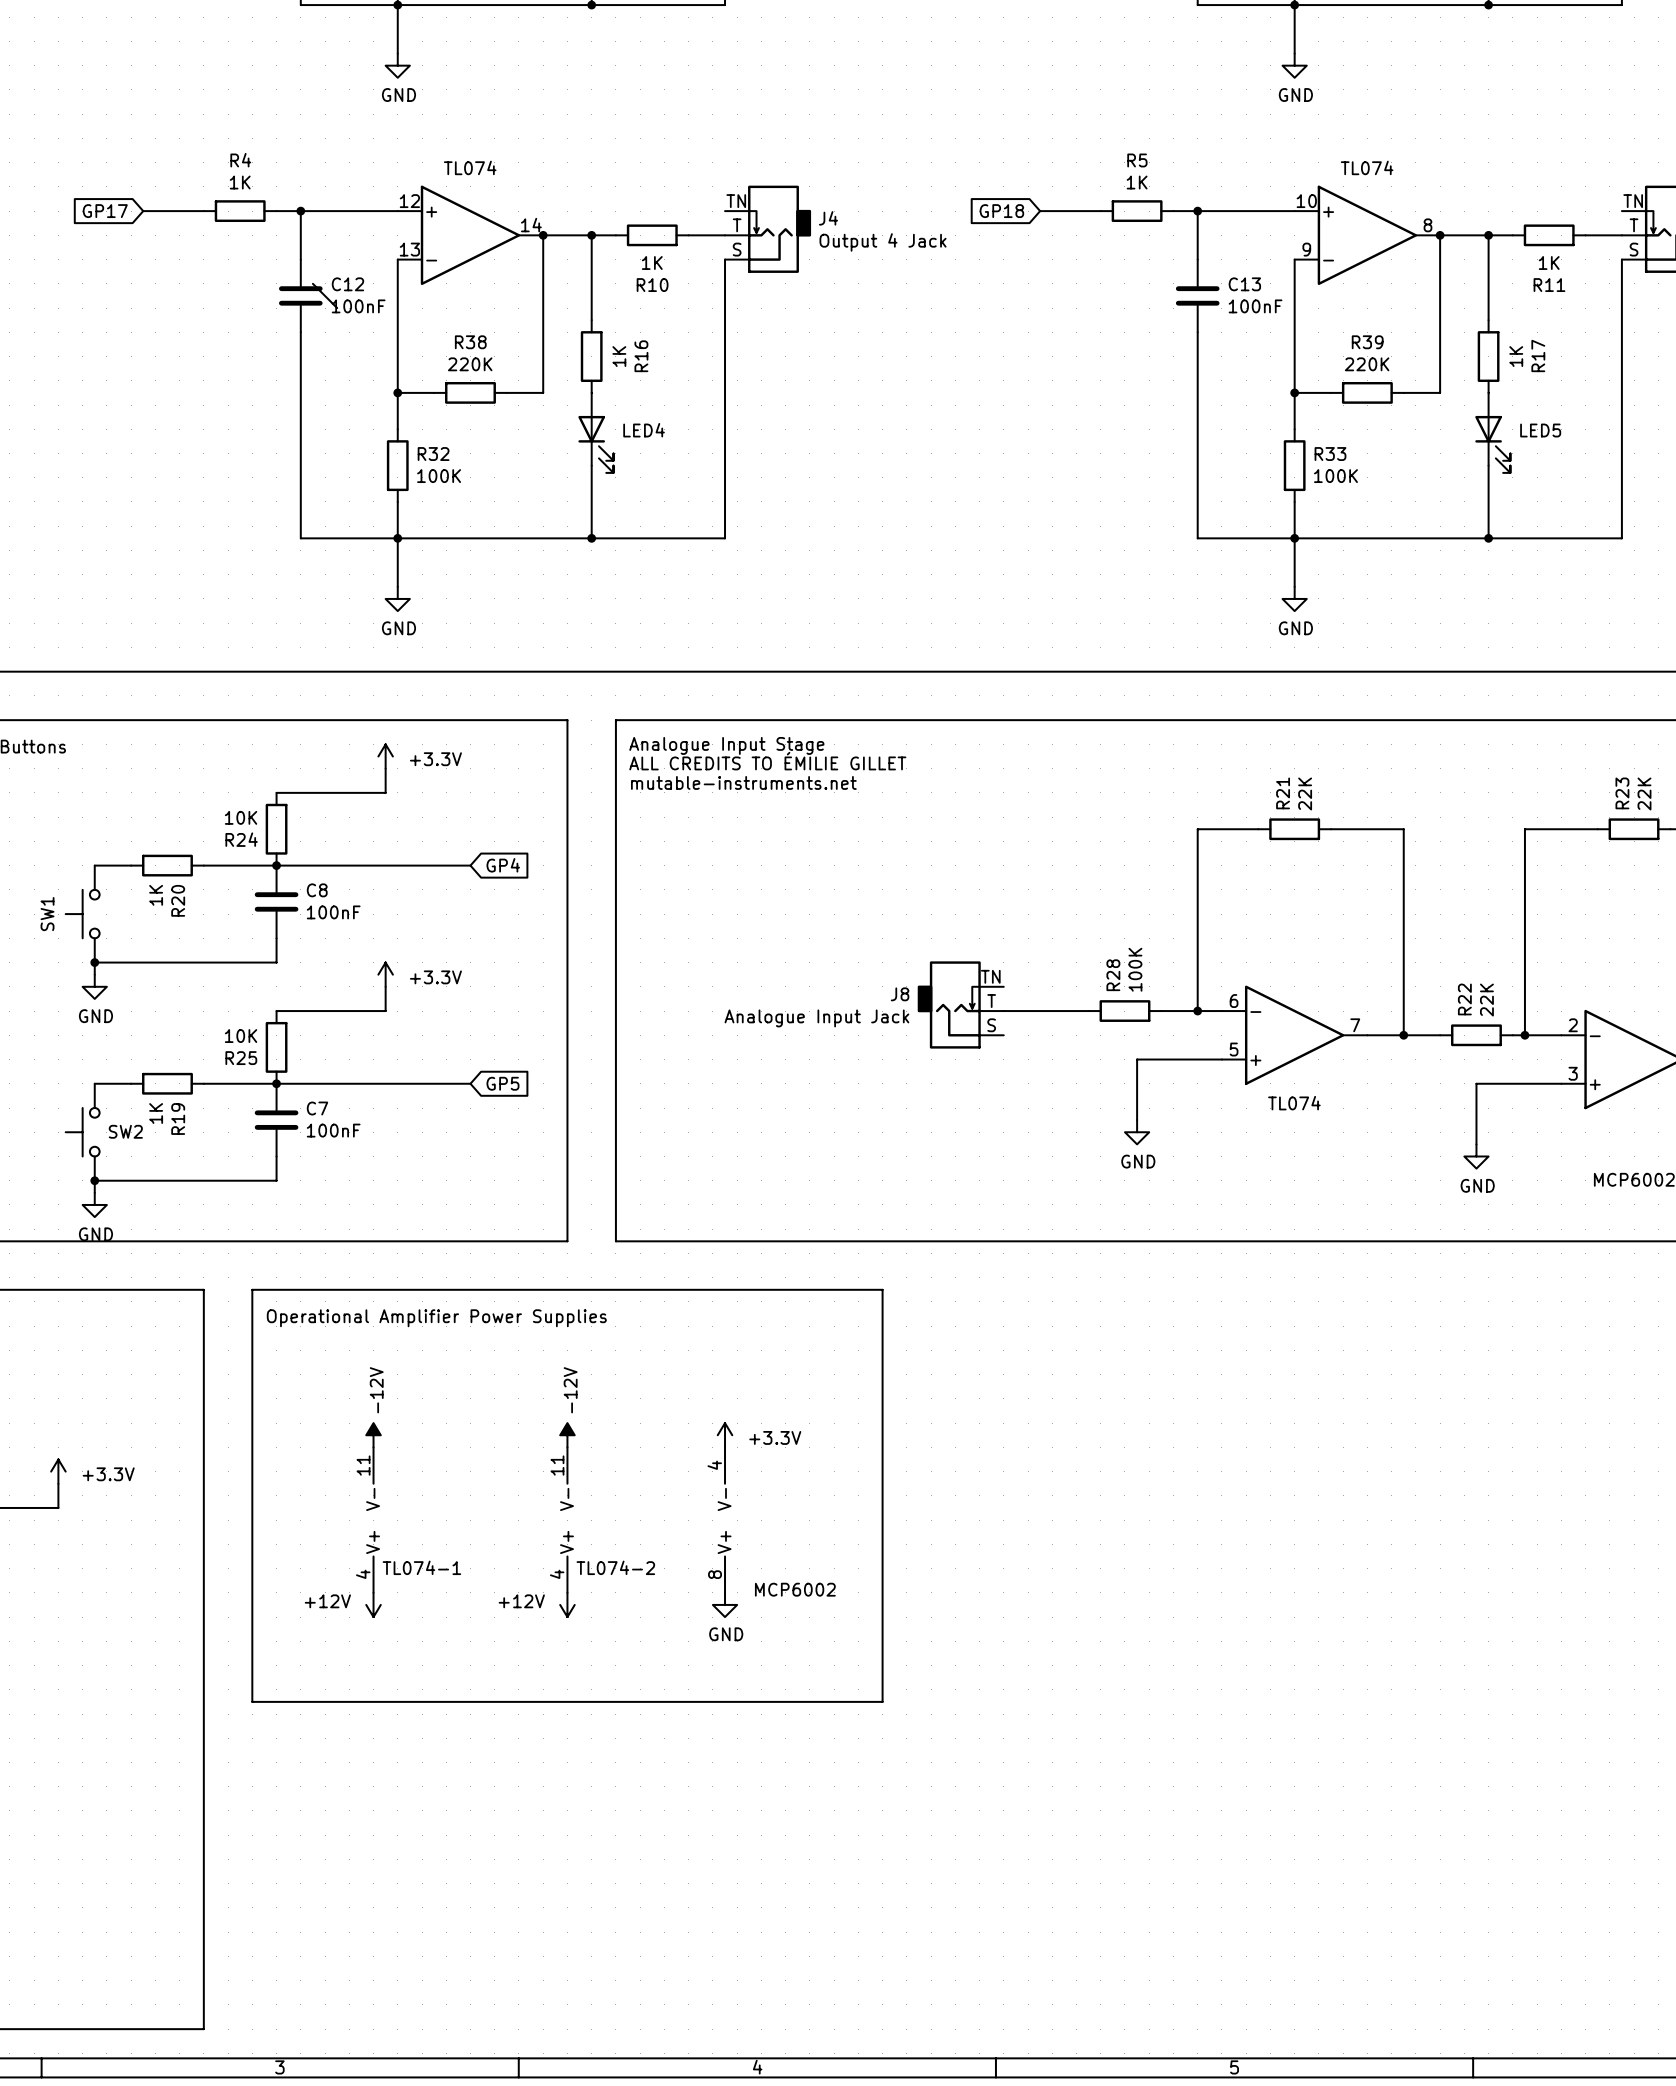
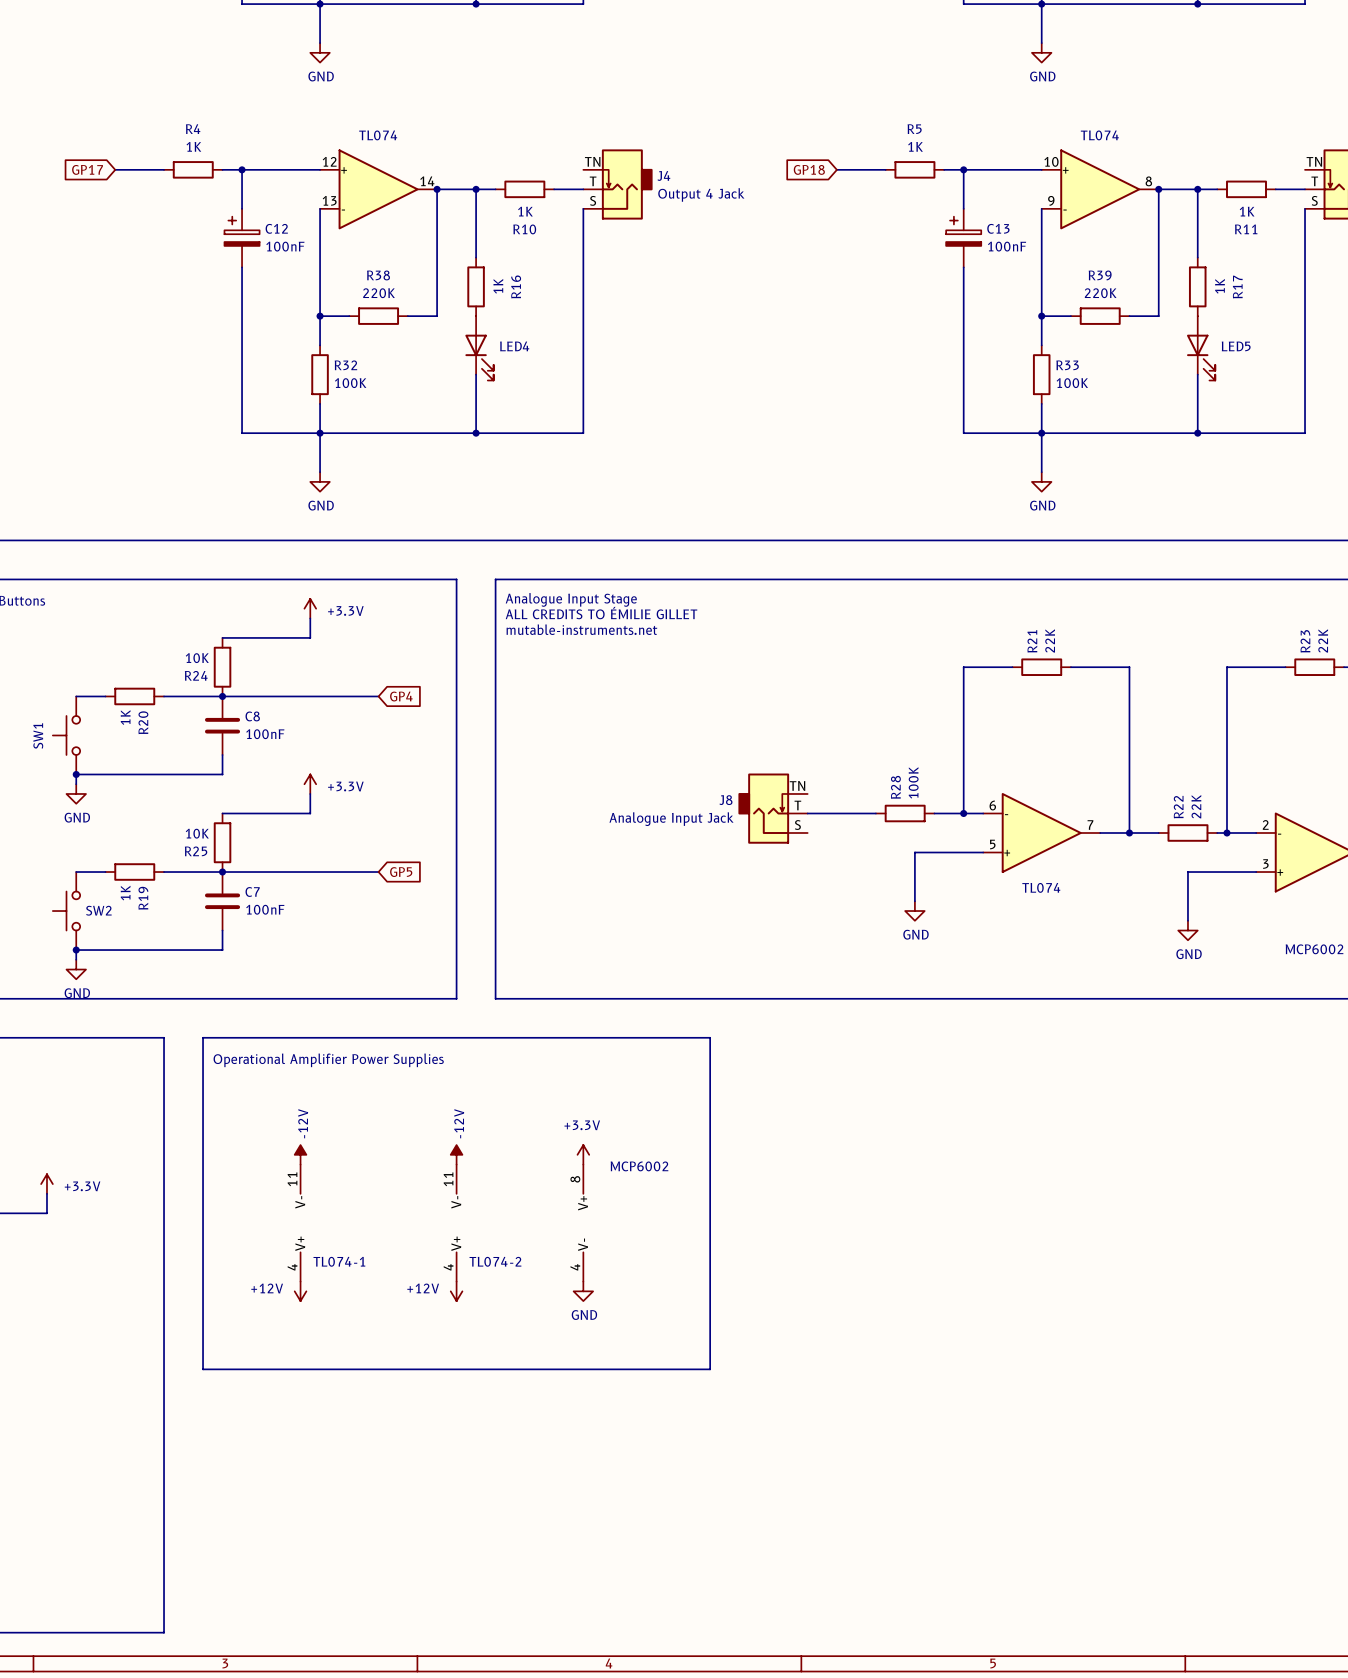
C12 symbol: [278, 259, 323, 333] -> [224, 208, 260, 268]
C13 symbol: [1175, 259, 1220, 333] -> [946, 208, 982, 268]
wire: (312, 283) (337, 308) -> none
part value position: +3.3V (775, 1437) -> +3.3V (582, 1125)
part rotation: 0° (725, 1520) -> 180° (583, 1223)
part value position: MCP6002 (795, 1589) -> MCP6002 (639, 1166)

